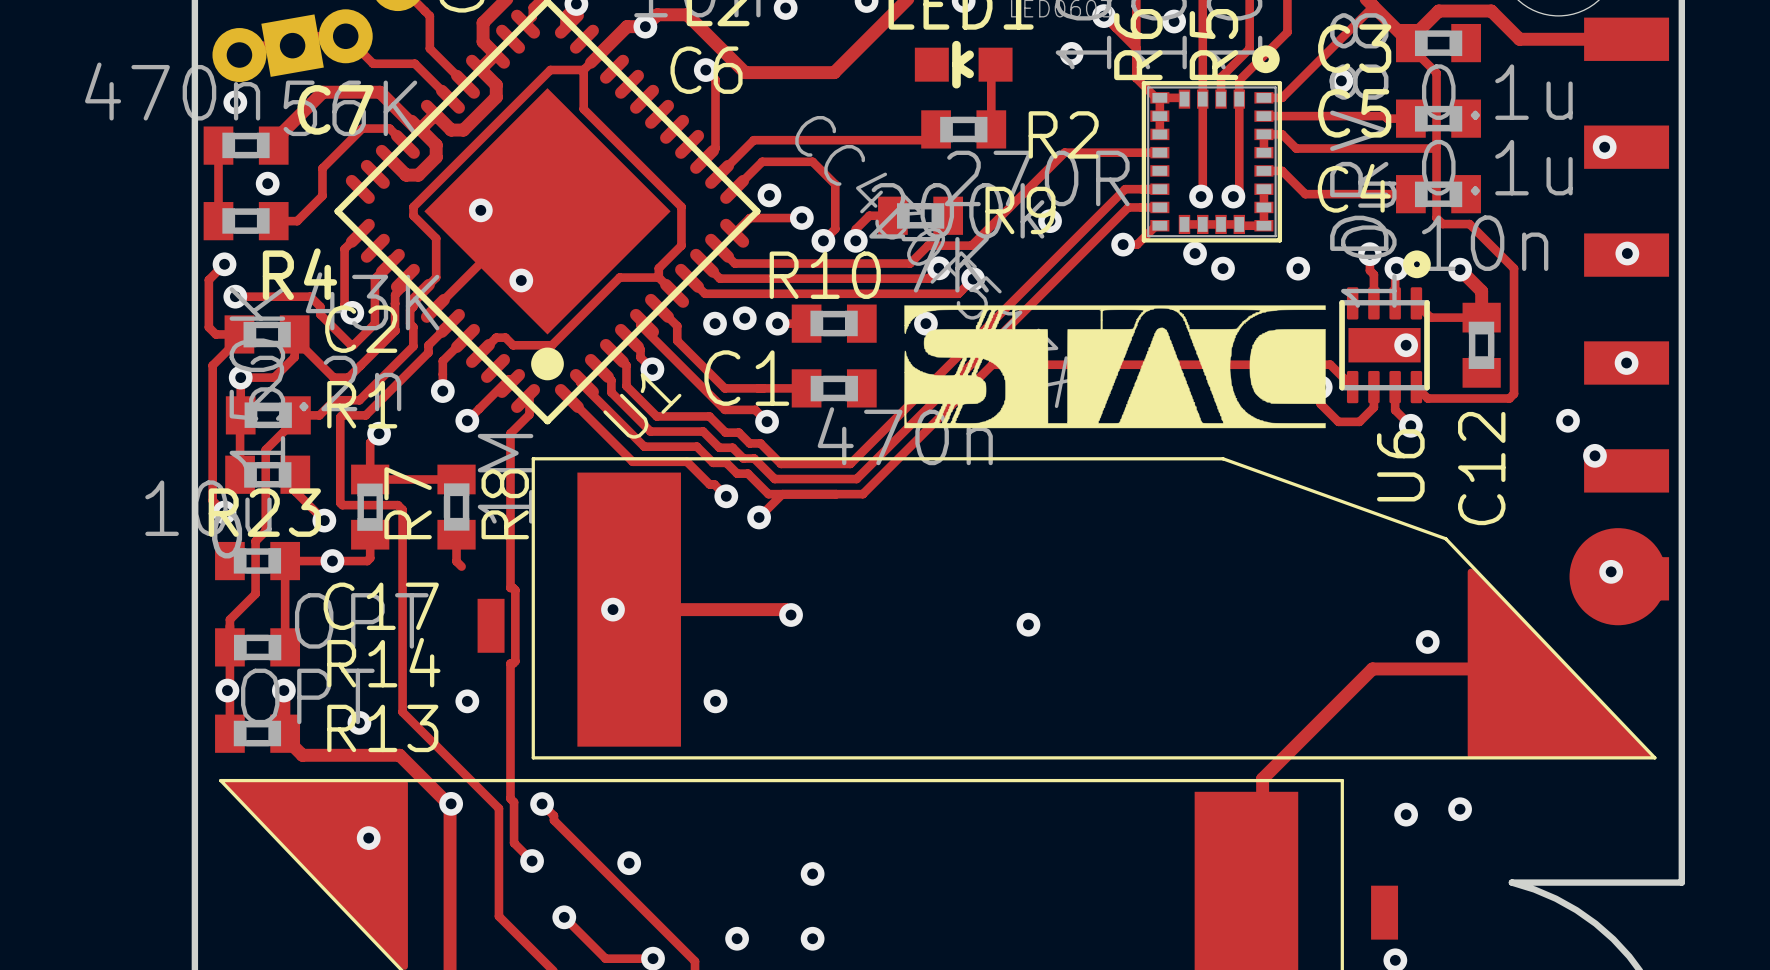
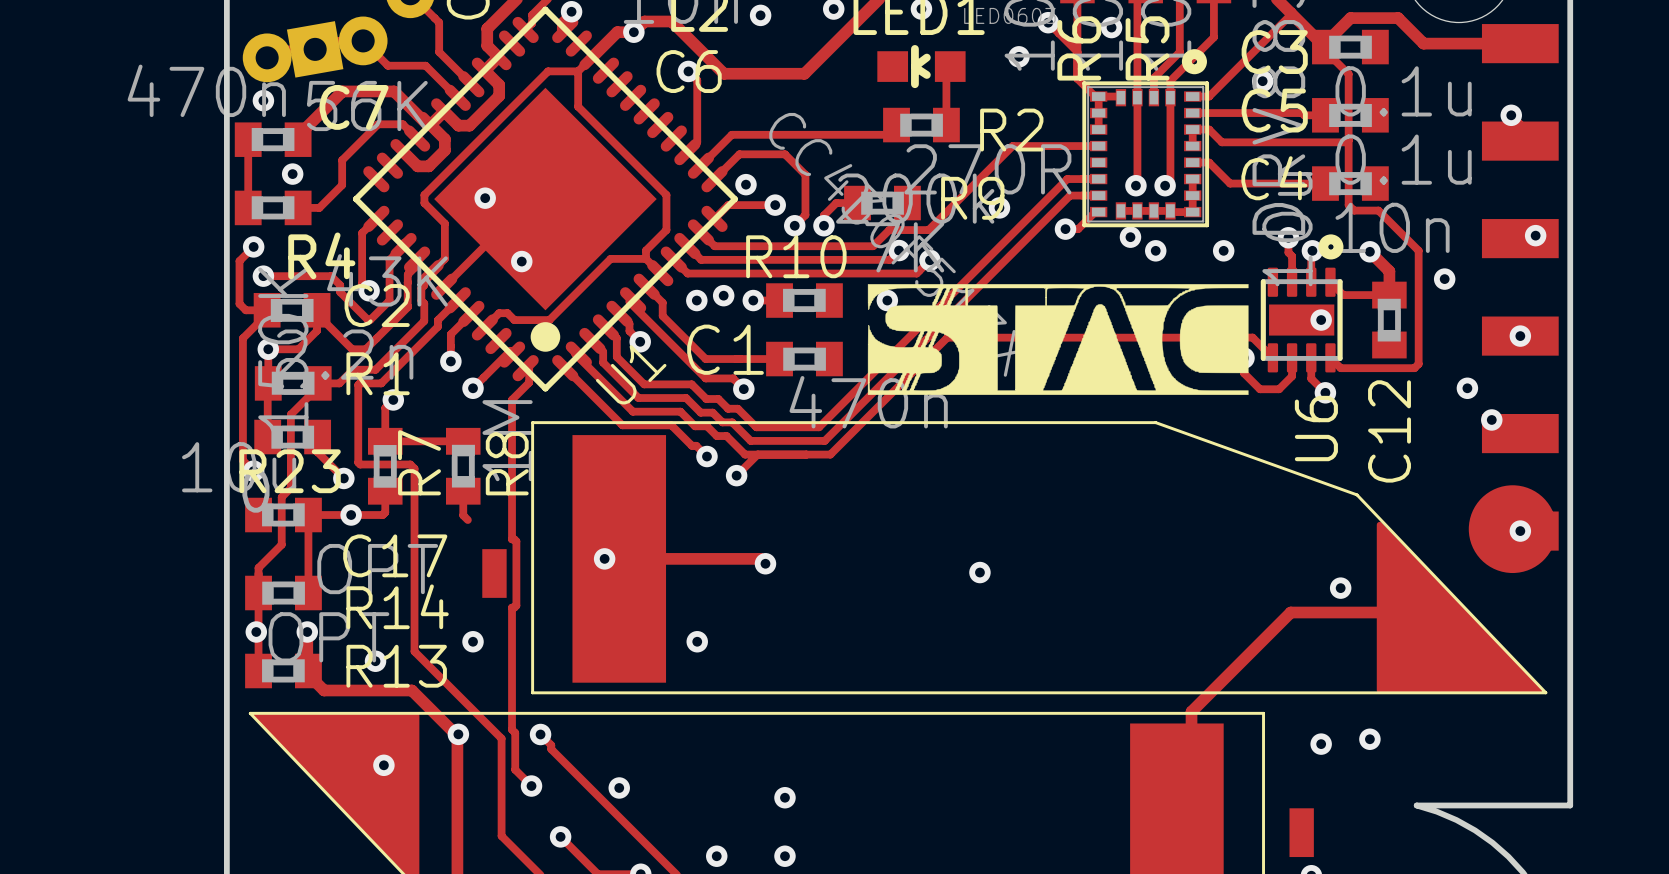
via position: (1604, 147) -> (1511, 115)
via position: (1627, 253) -> (1535, 235)
via: none -> (1444, 279)
via position: (1611, 571) -> (1520, 531)

